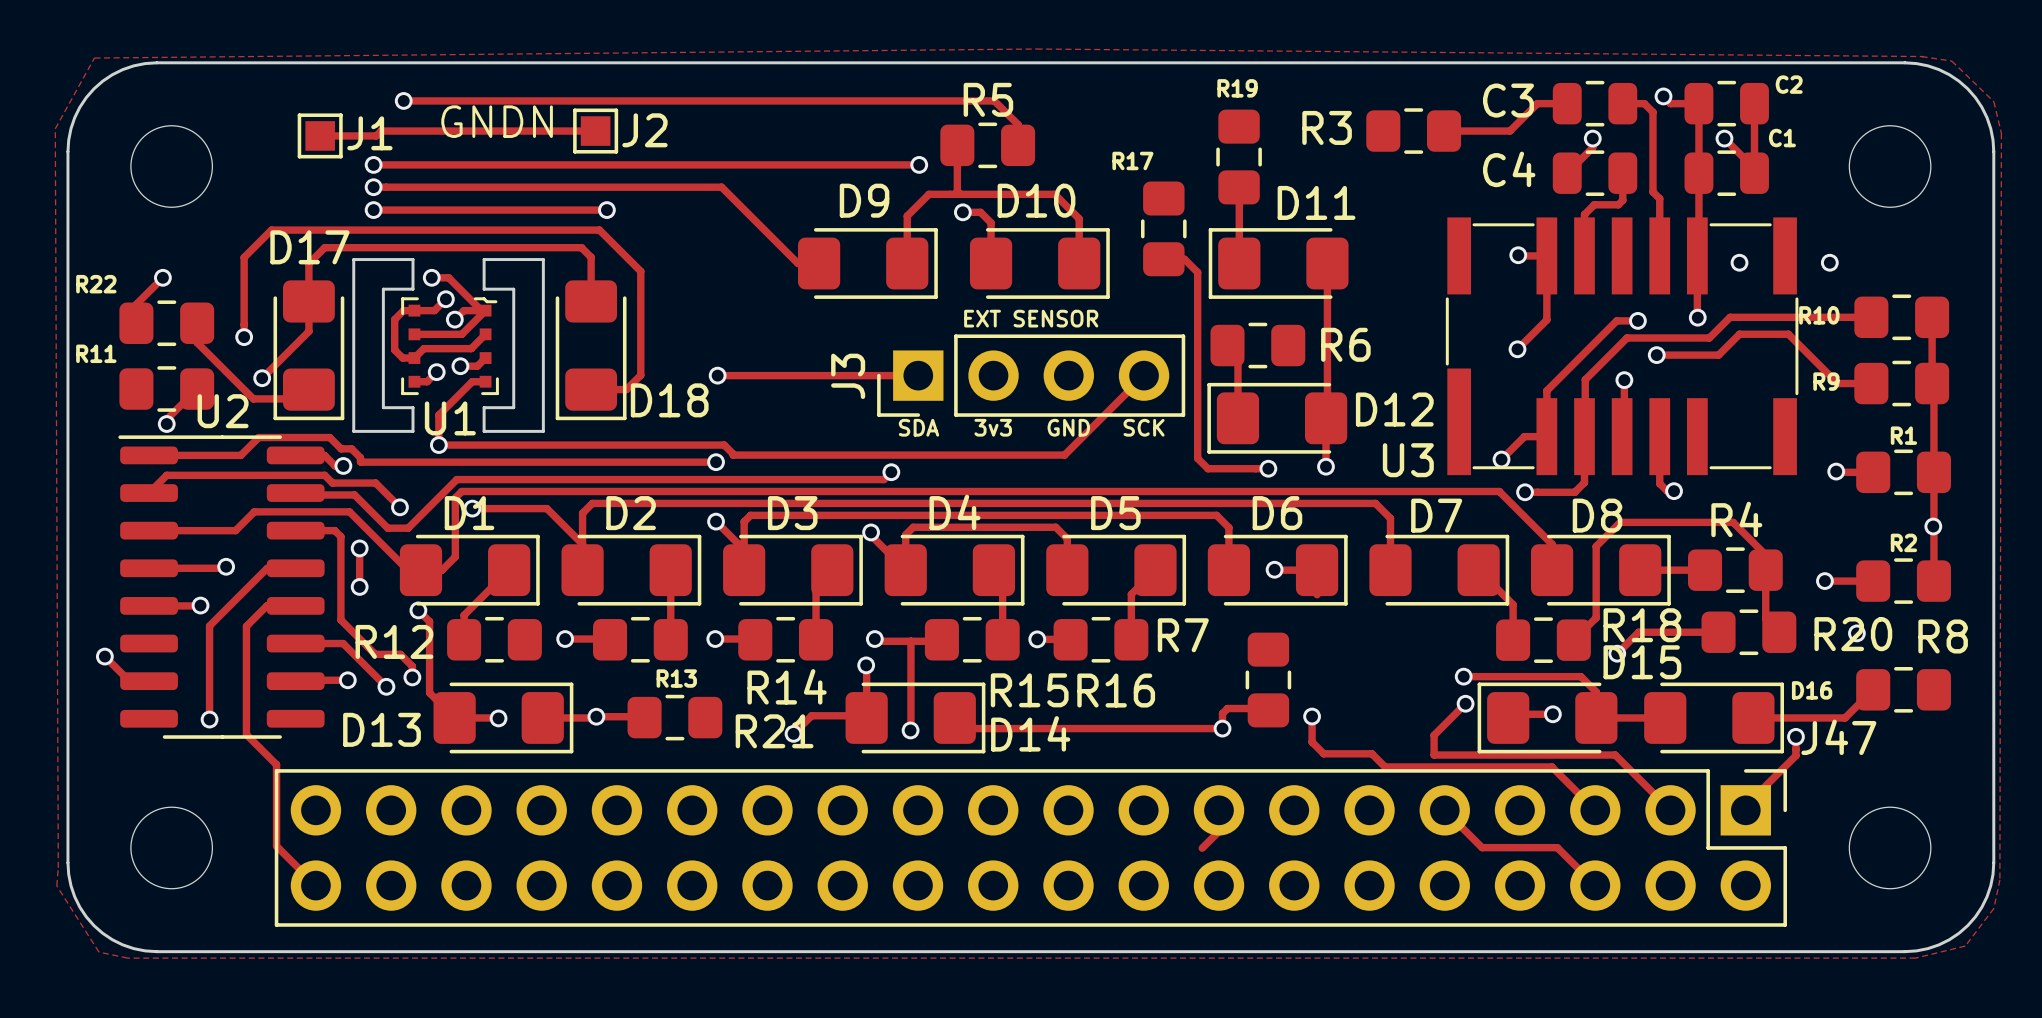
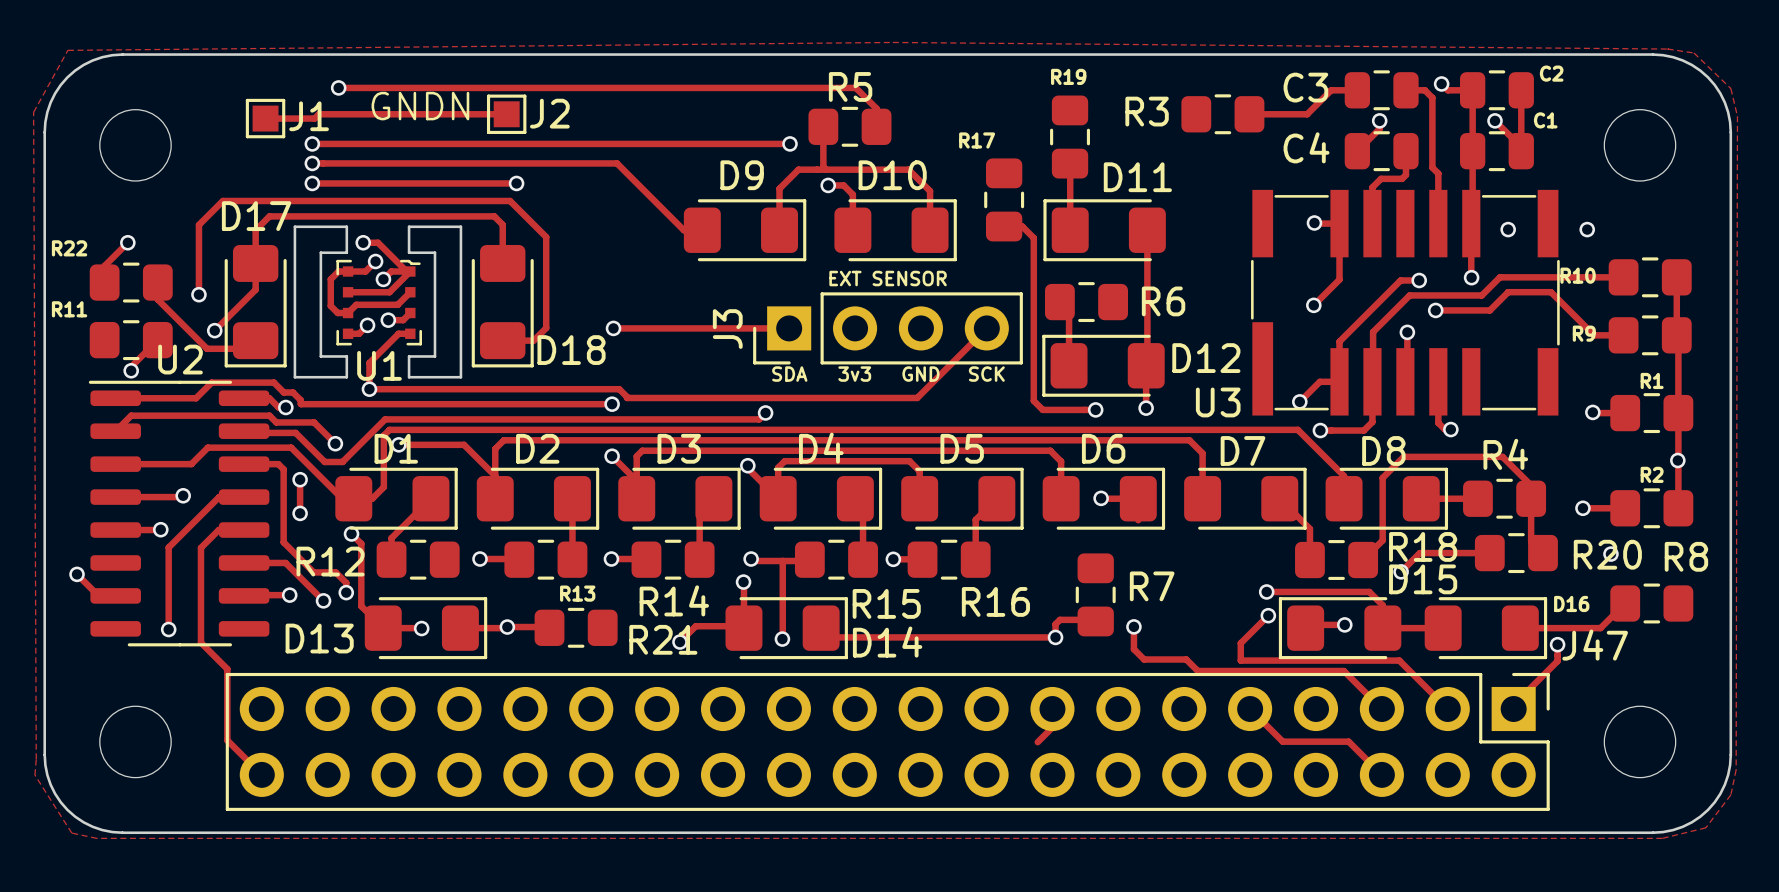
R7 name position: R7 (1183, 635) -> R7 (1152, 586)
R16 name position: R16 (1116, 690) -> R16 (995, 601)

